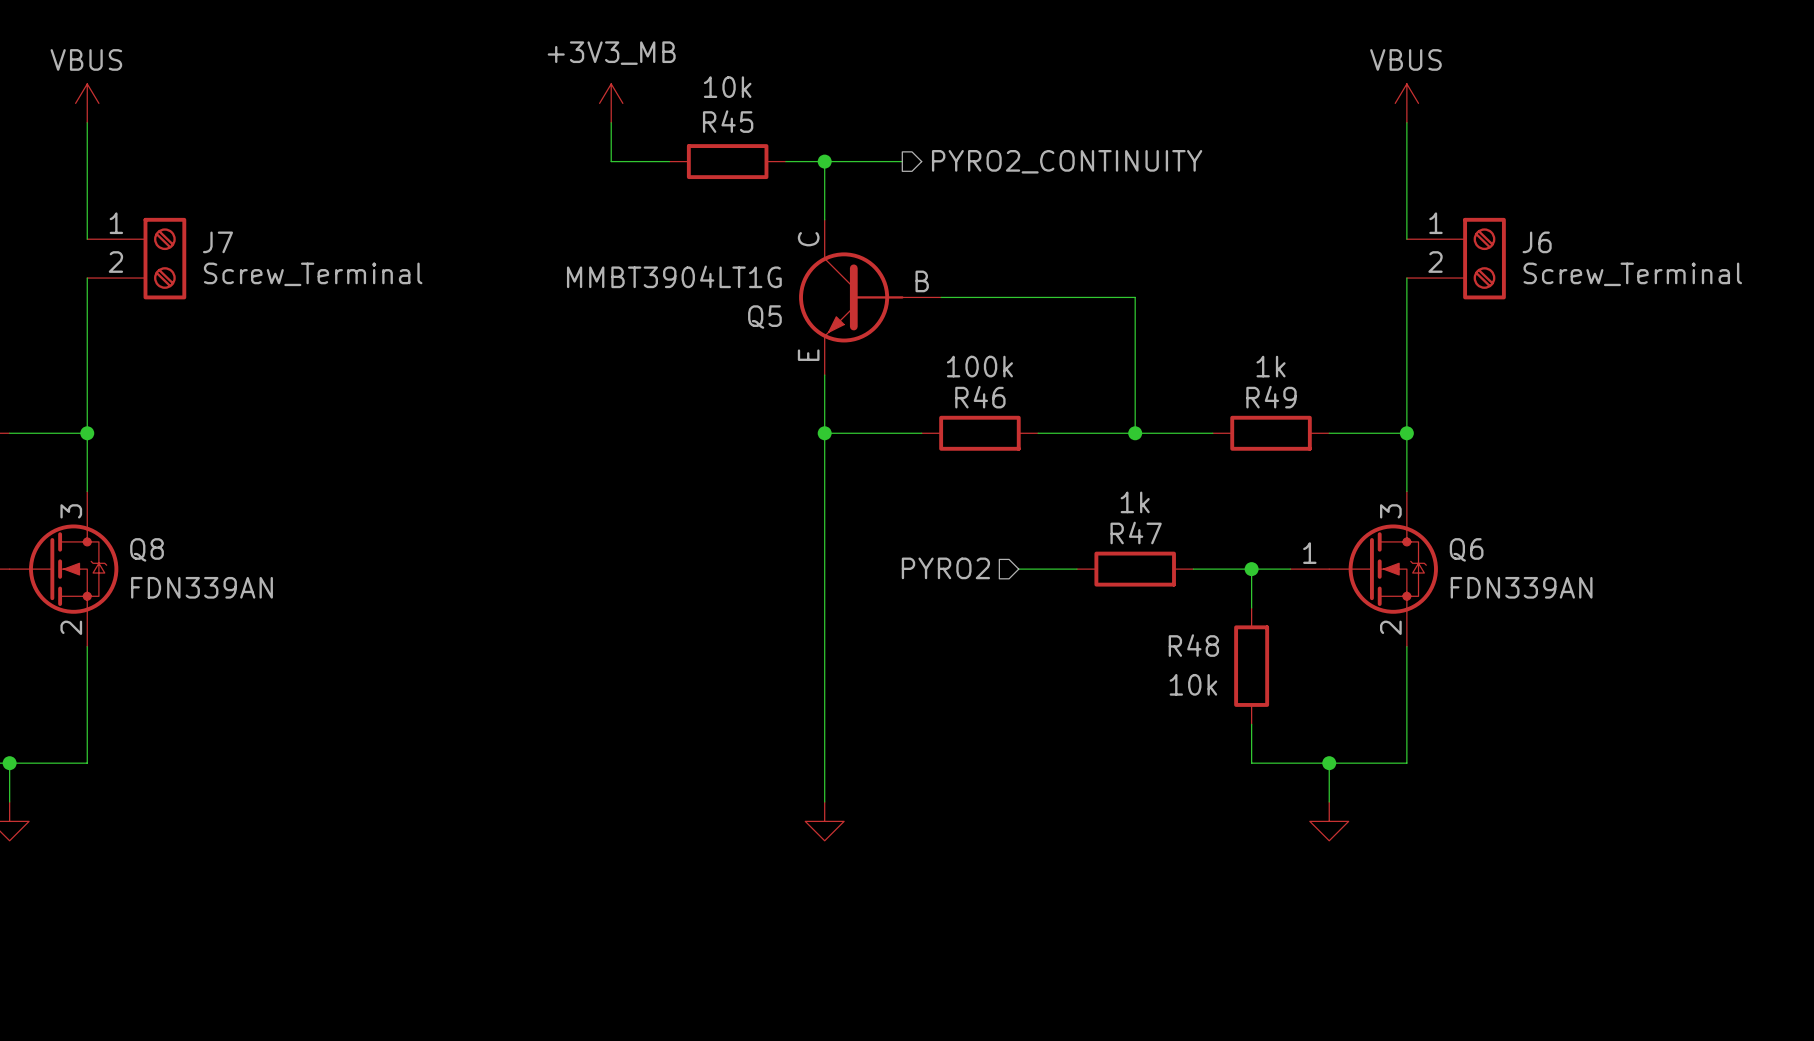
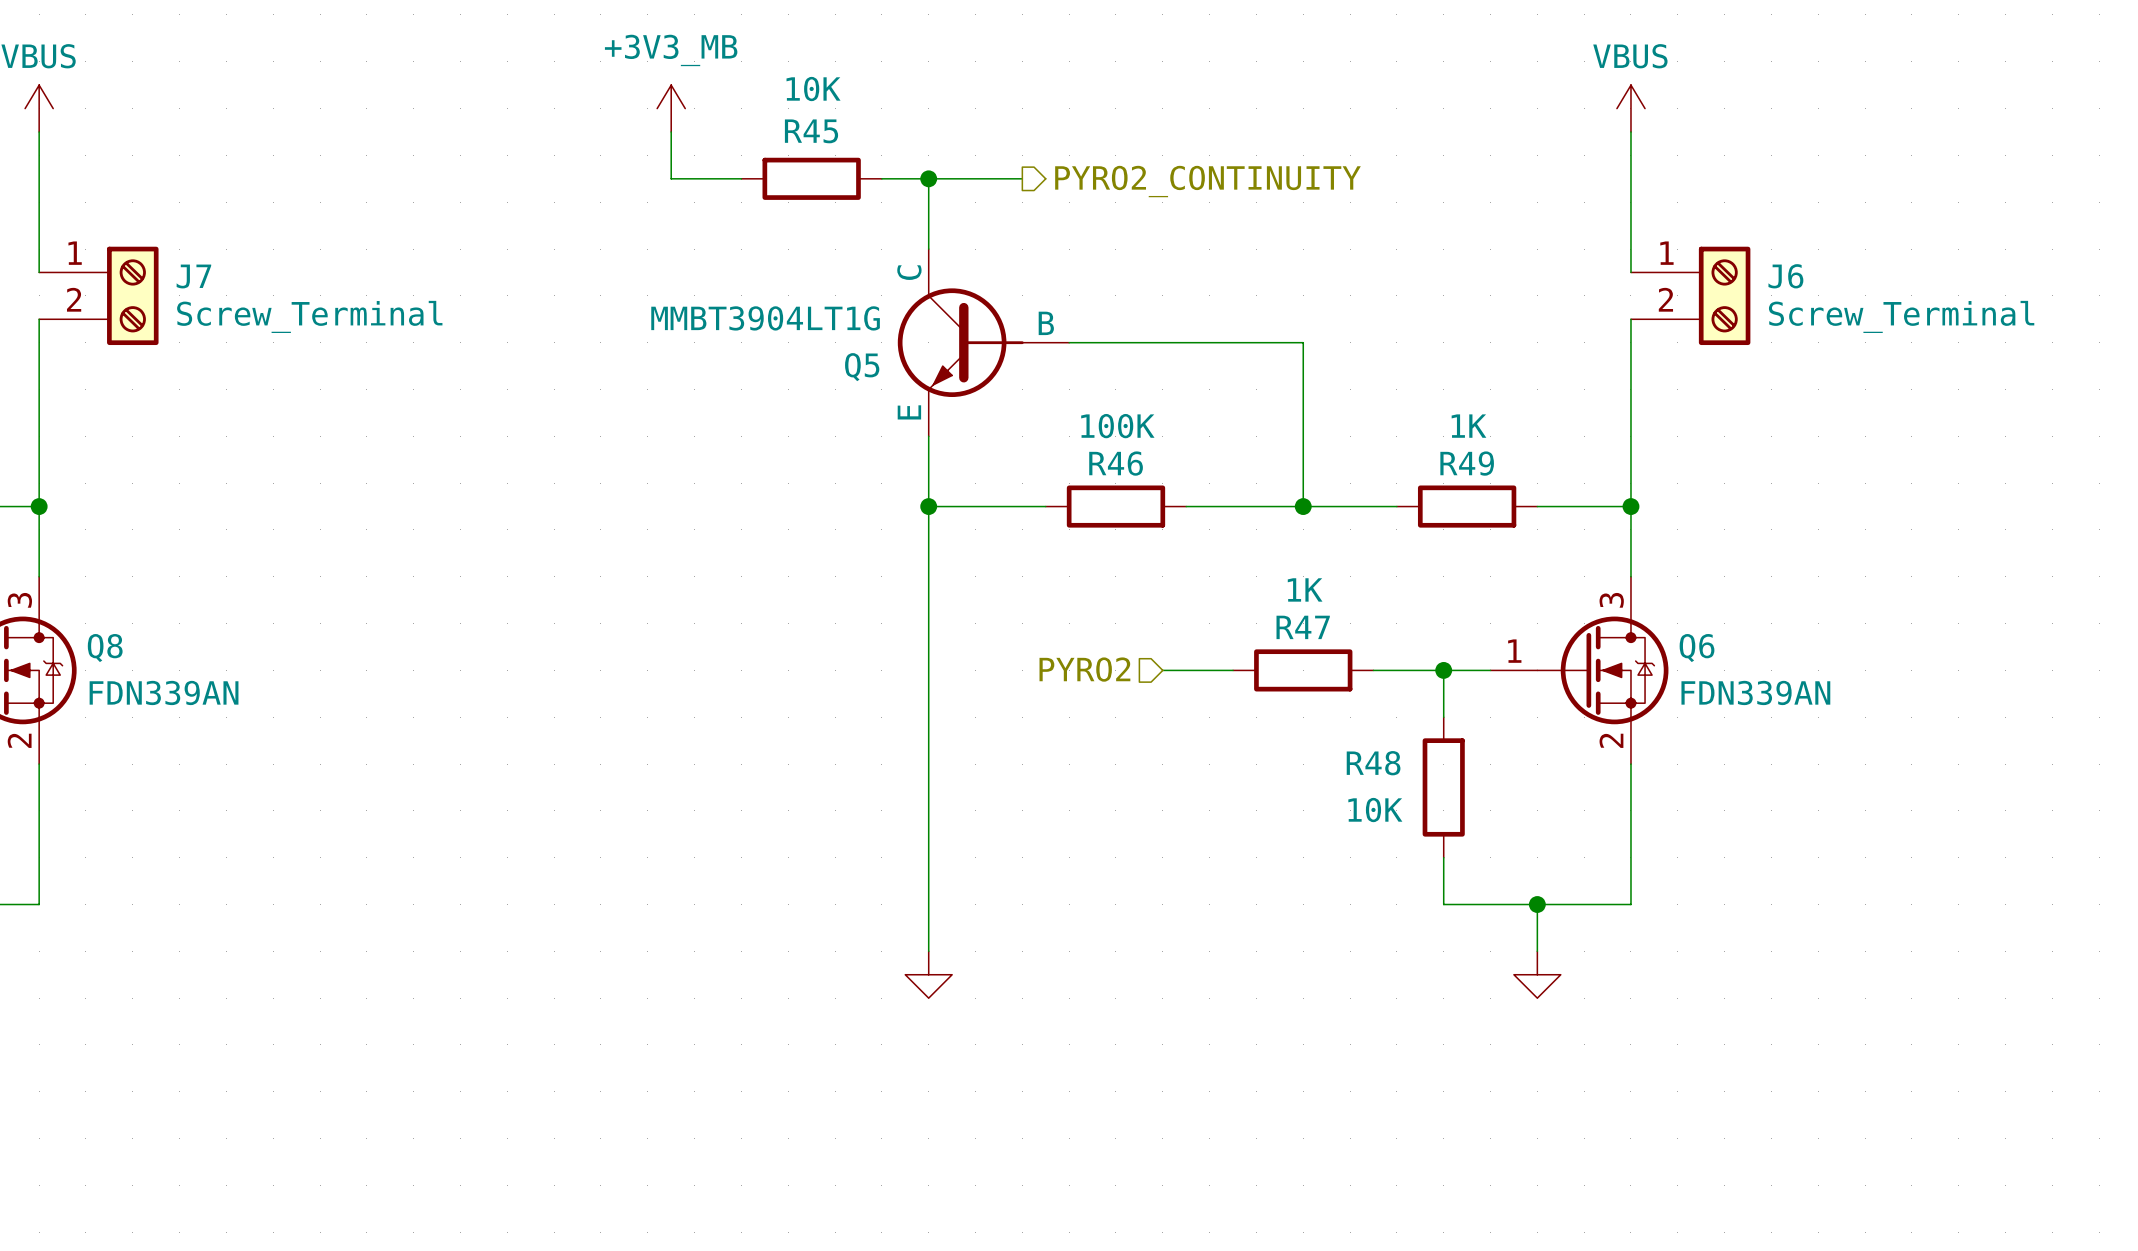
R45 value: 10k (727, 87) -> 10K (813, 89)
R46 value: 100k (979, 366) -> 100K (1117, 426)
R49 value: 1k (1271, 366) -> 1K (1468, 426)
R47 value: 1k (1135, 502) -> 1K (1305, 589)
R48 value: 10k (1193, 684) -> 10K (1375, 810)

